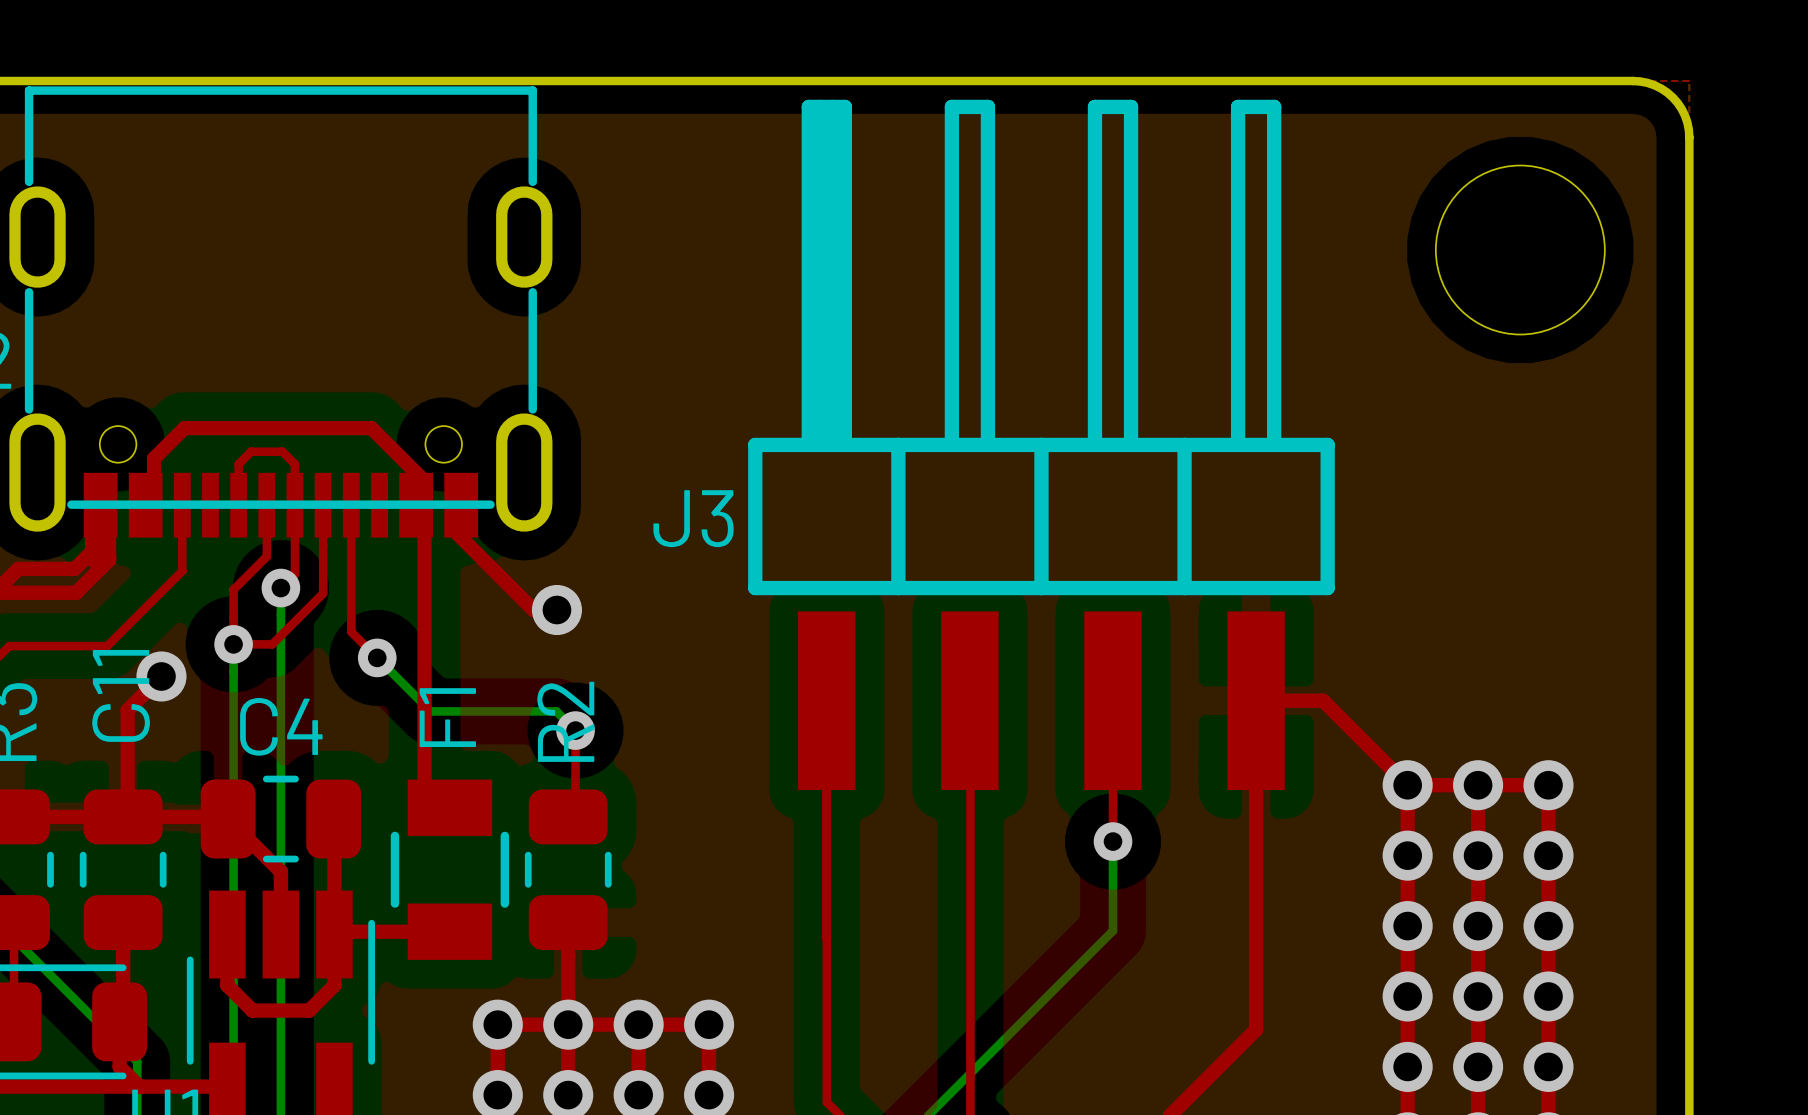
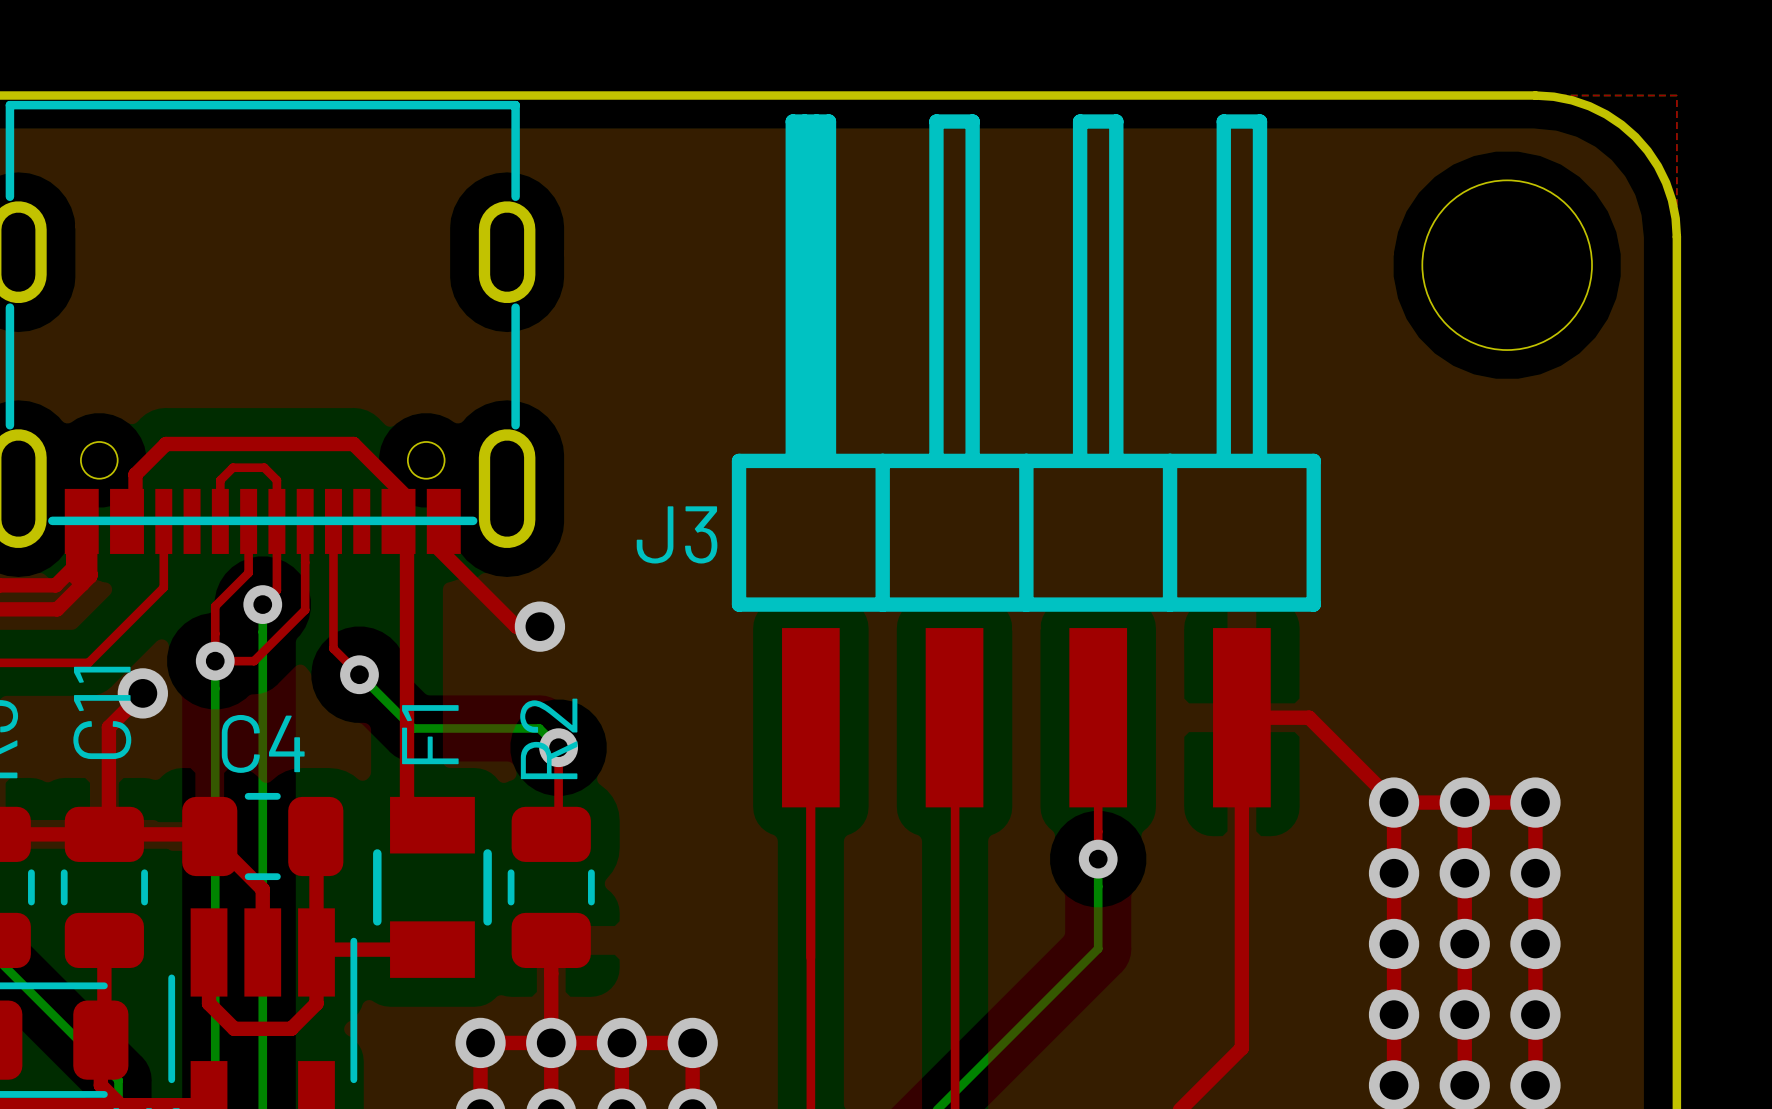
board edge: (1548, 81) (1640, 81) (1654, 85) (1672, 97) (1681, 109) (1688, 129) (1689, 221) -> (1535, 95) (1553, 96) (1589, 106) (1621, 124) (1635, 136) (1657, 166) (1666, 182) (1675, 218) (1676, 236)

